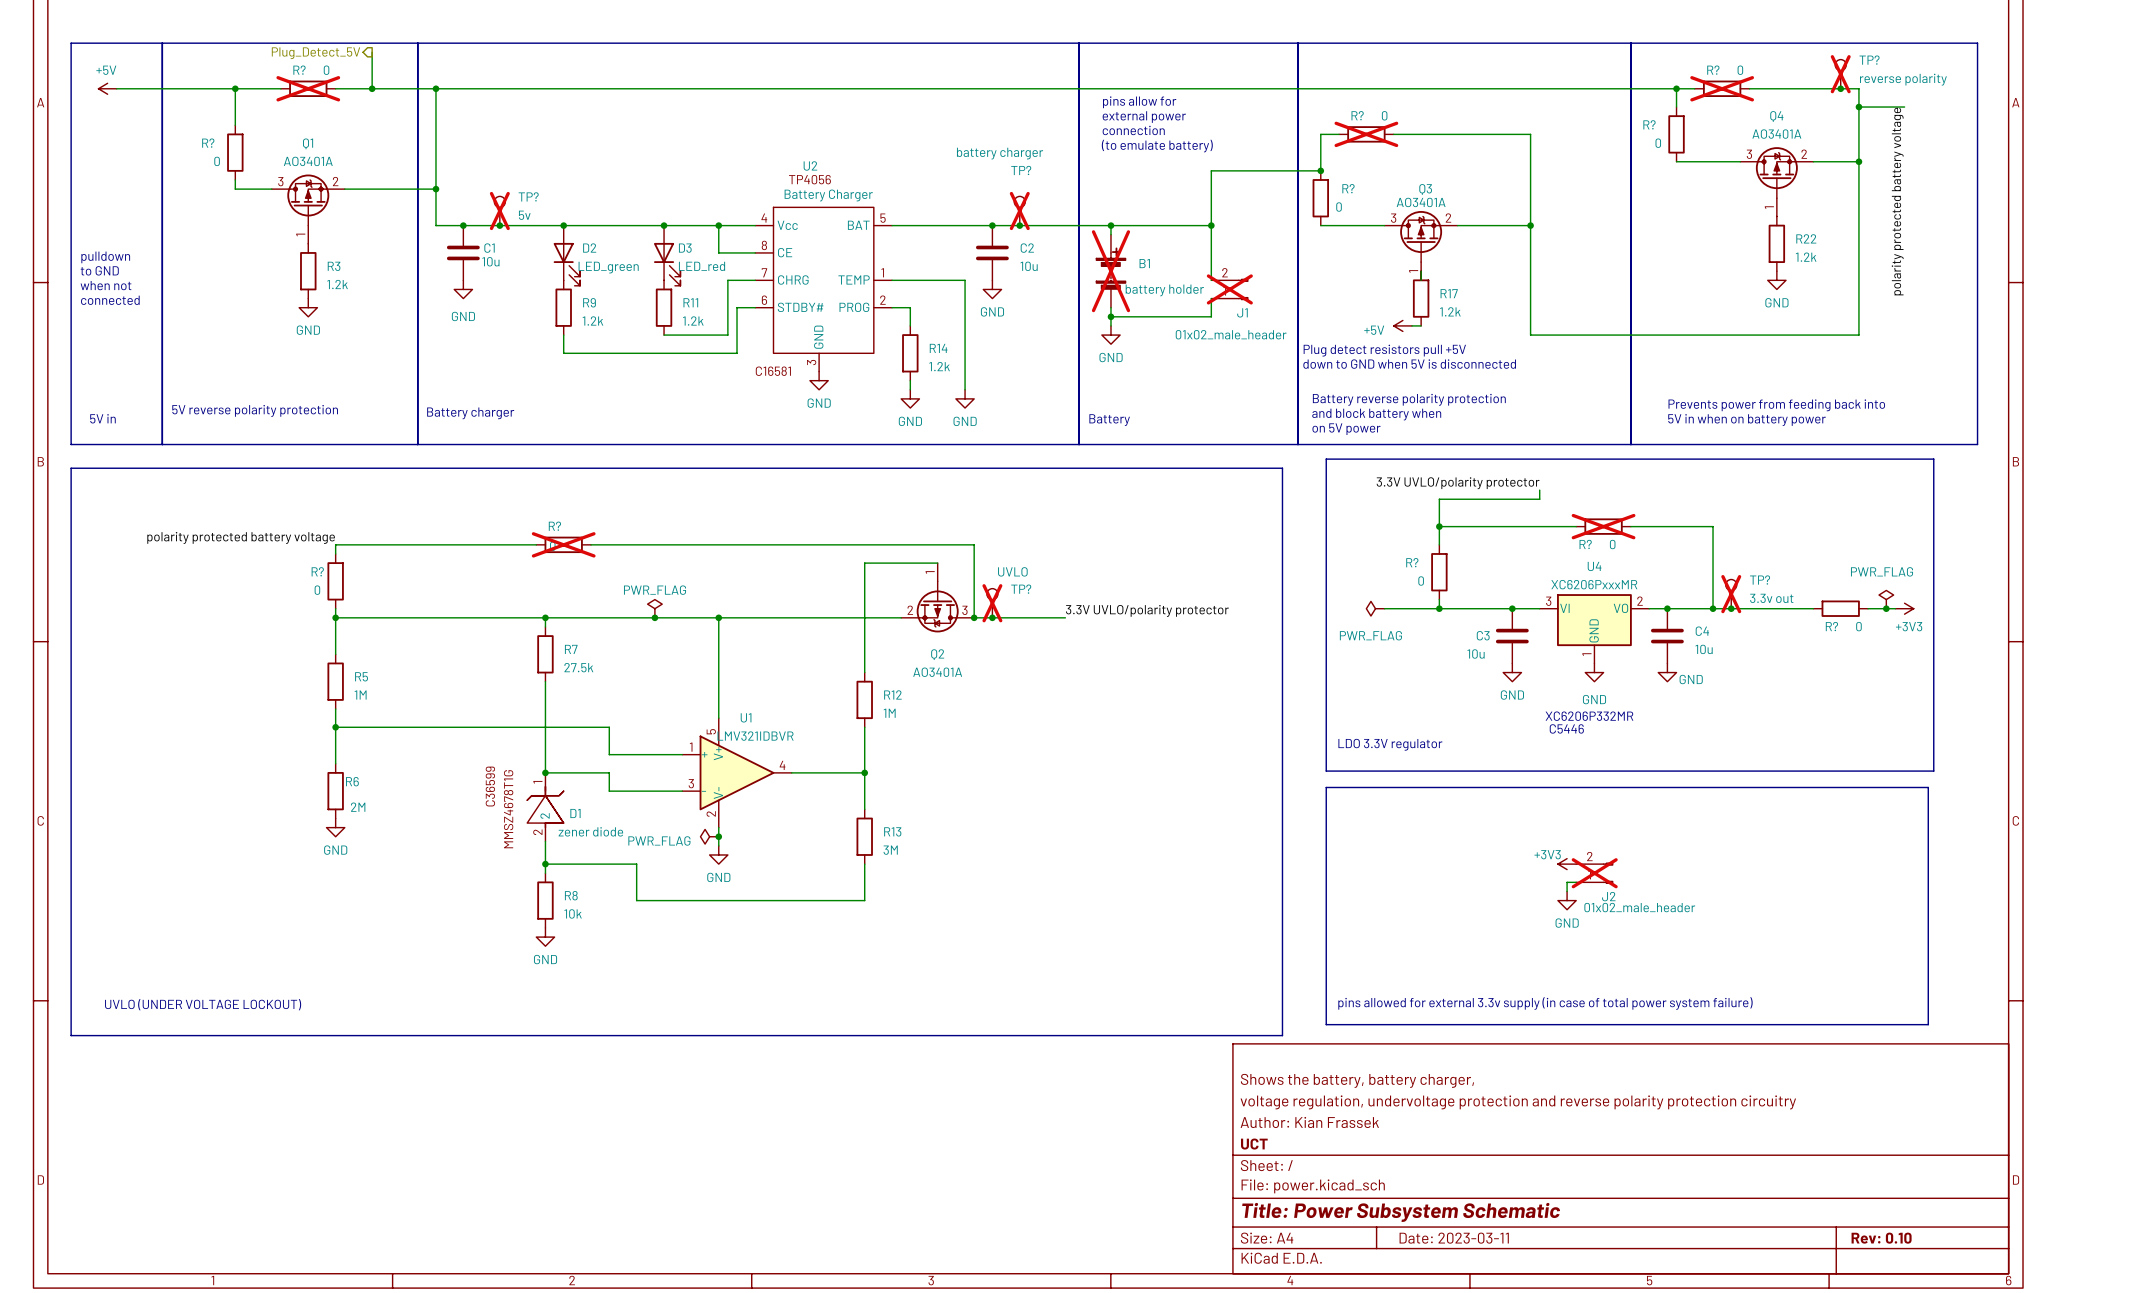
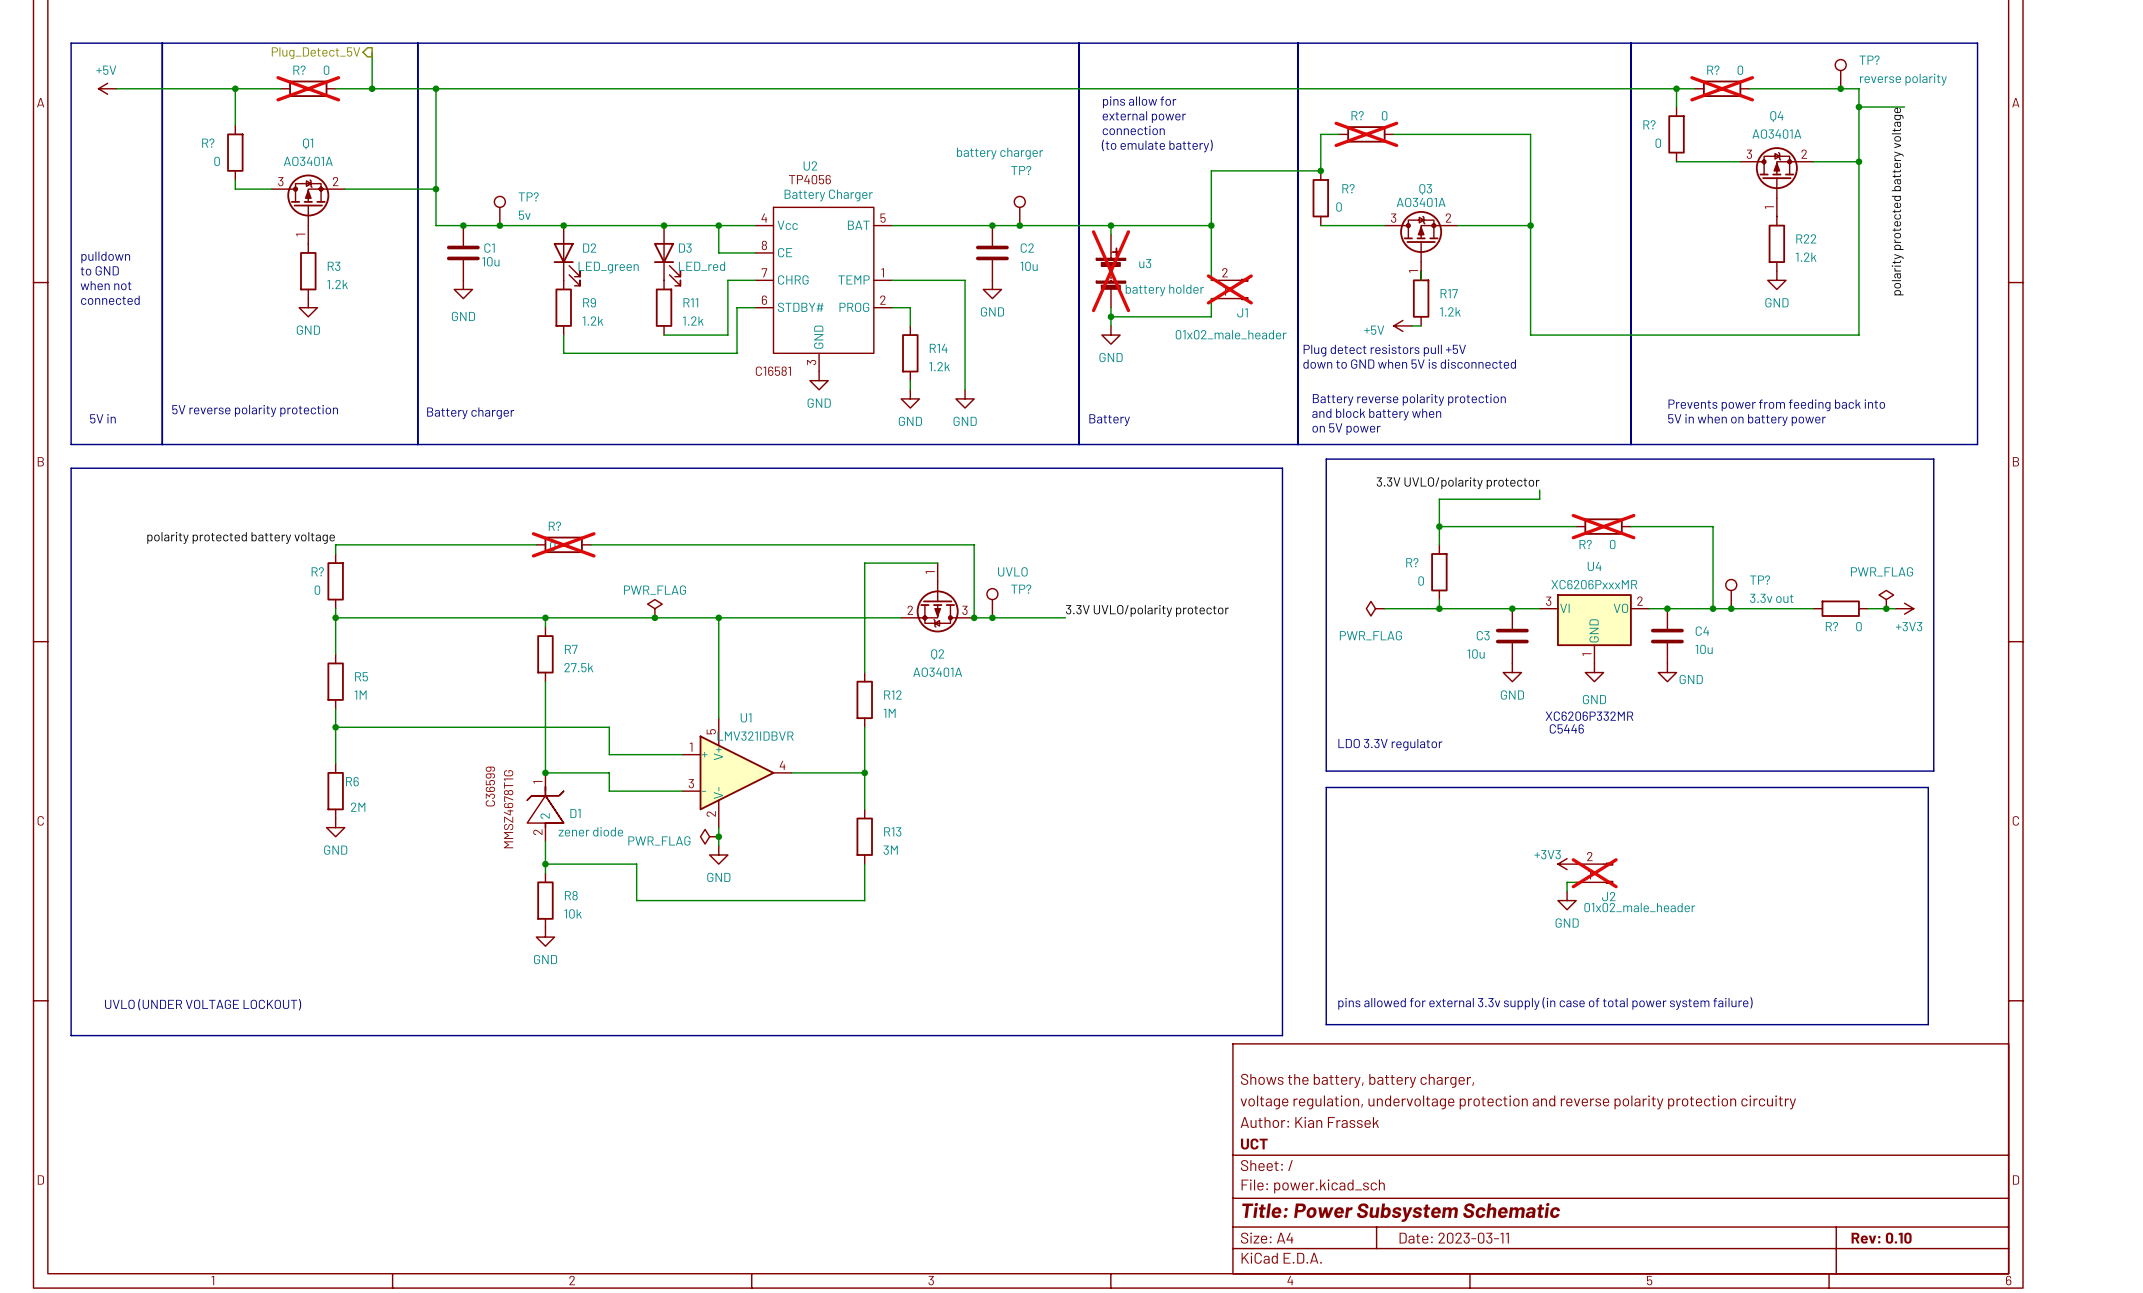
TP? do-not-place cross: (1840, 74) -> none
TP? do-not-place cross: (499, 211) -> none
TP? do-not-place cross: (1019, 211) -> none
B1 name: B1 (1144, 263) -> u3 (1145, 263)
TP? do-not-place cross: (1731, 594) -> none
TP? do-not-place cross: (992, 603) -> none

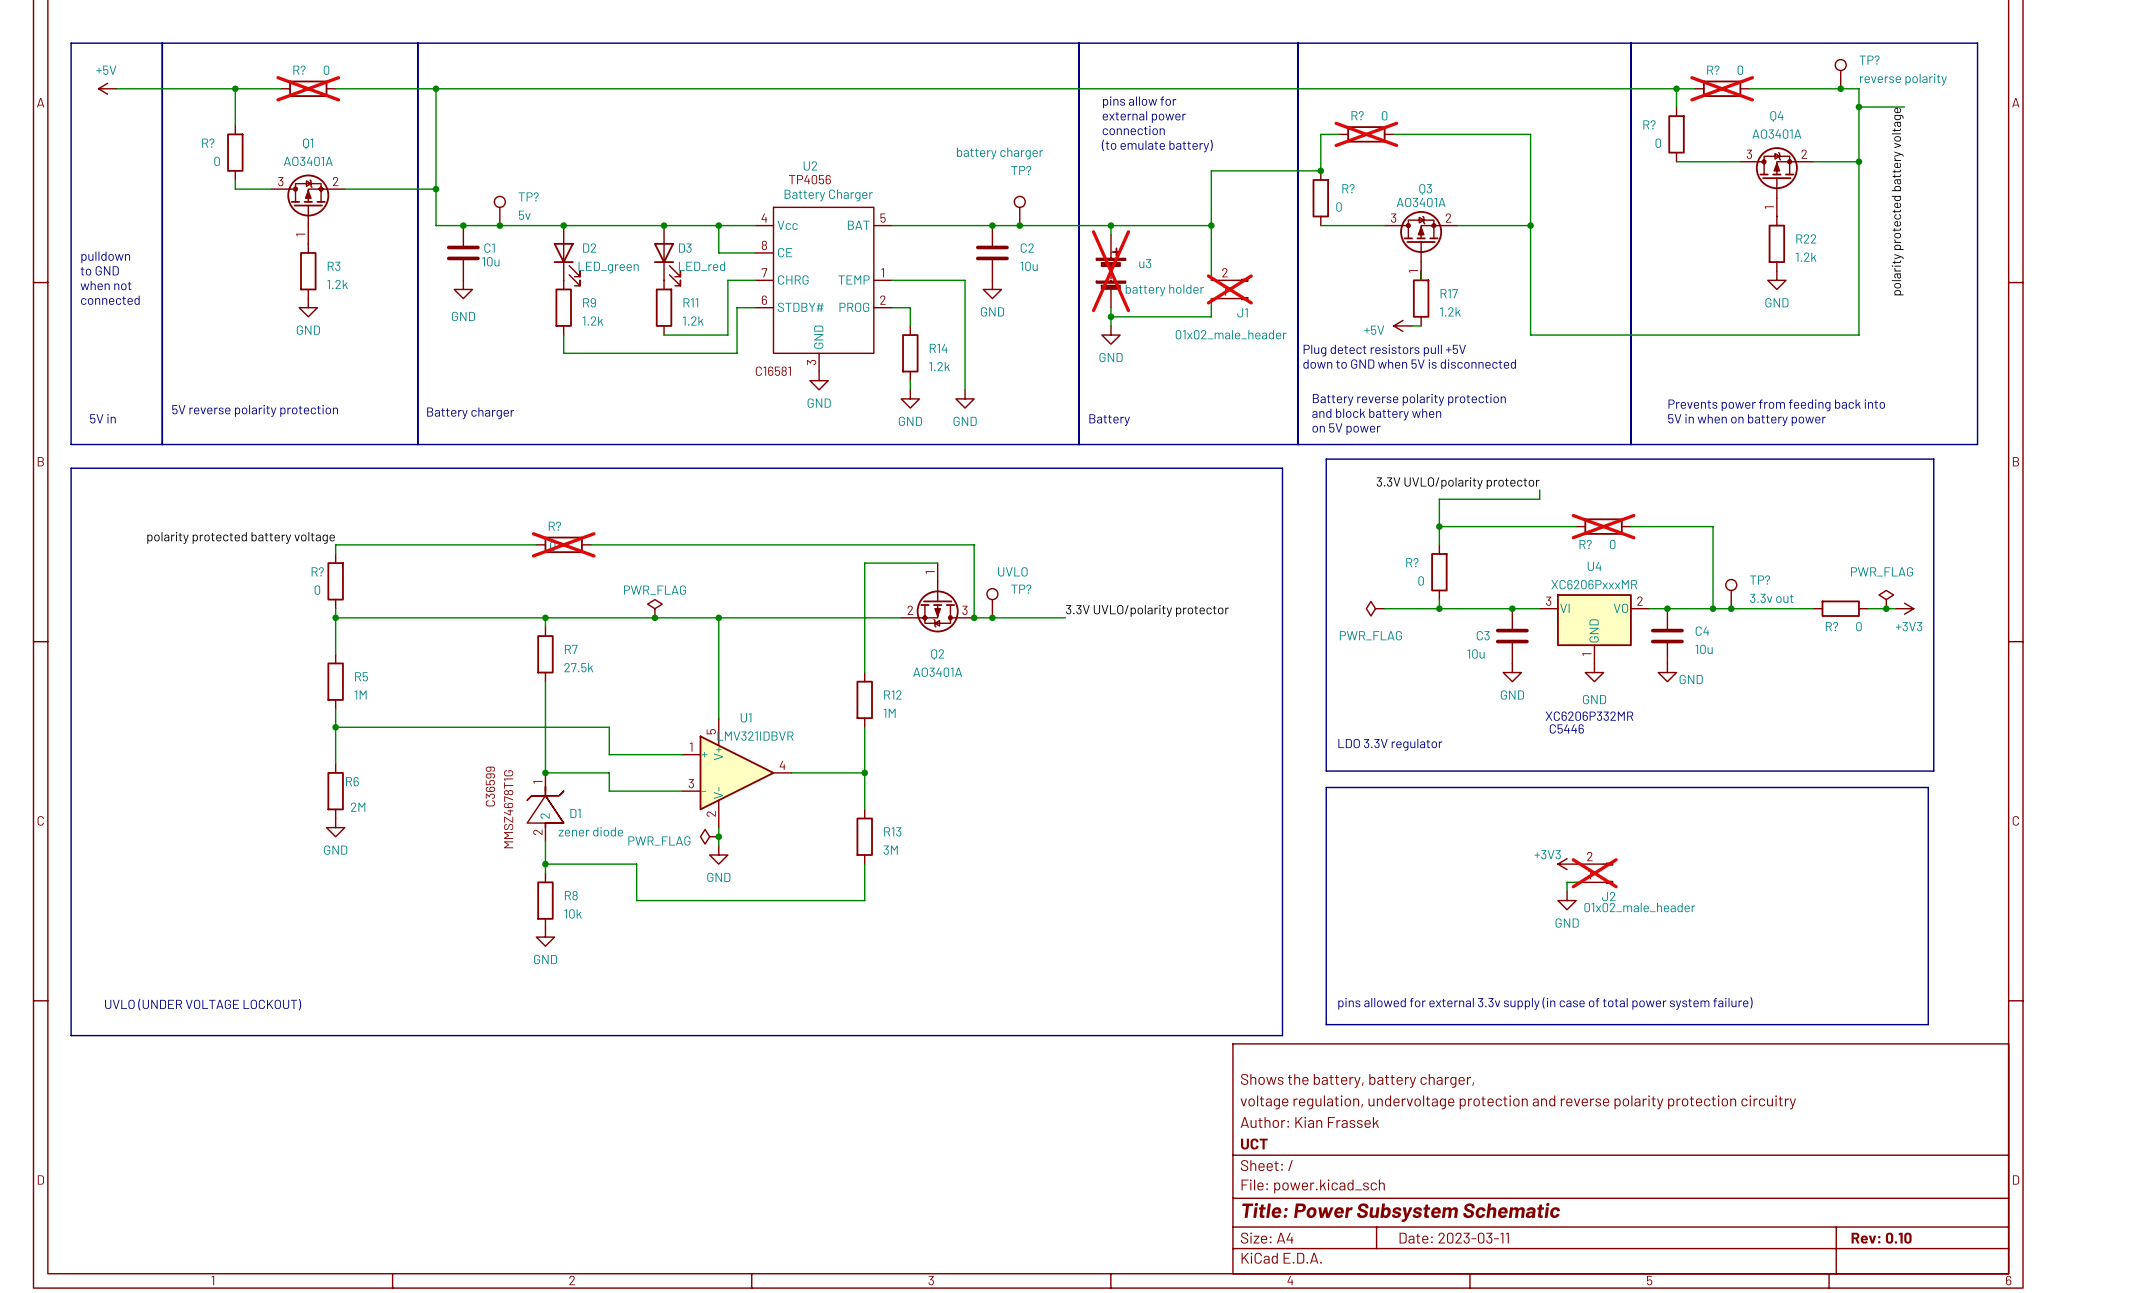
wire: (372, 52) (372, 88) -> none
hierarchical label: Plug_Detect_5V (315, 53) -> none
junction: (372, 88) -> none

